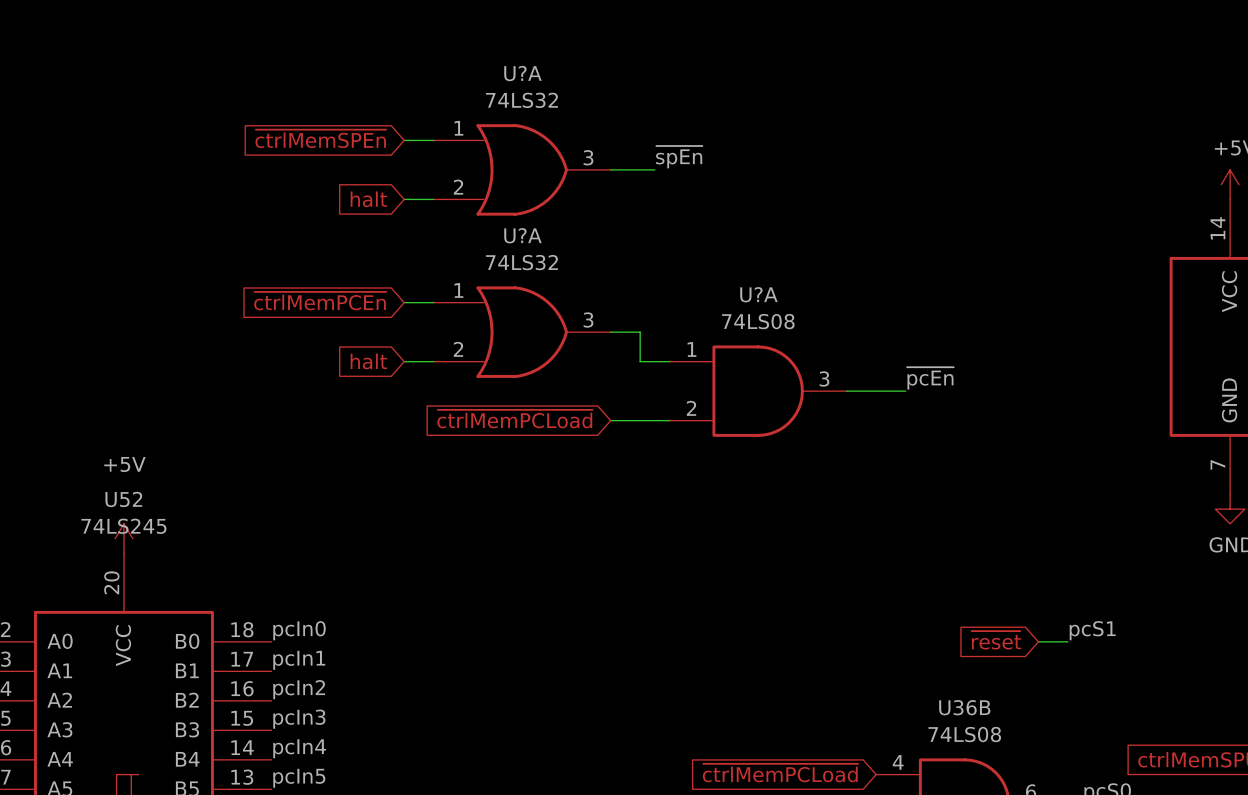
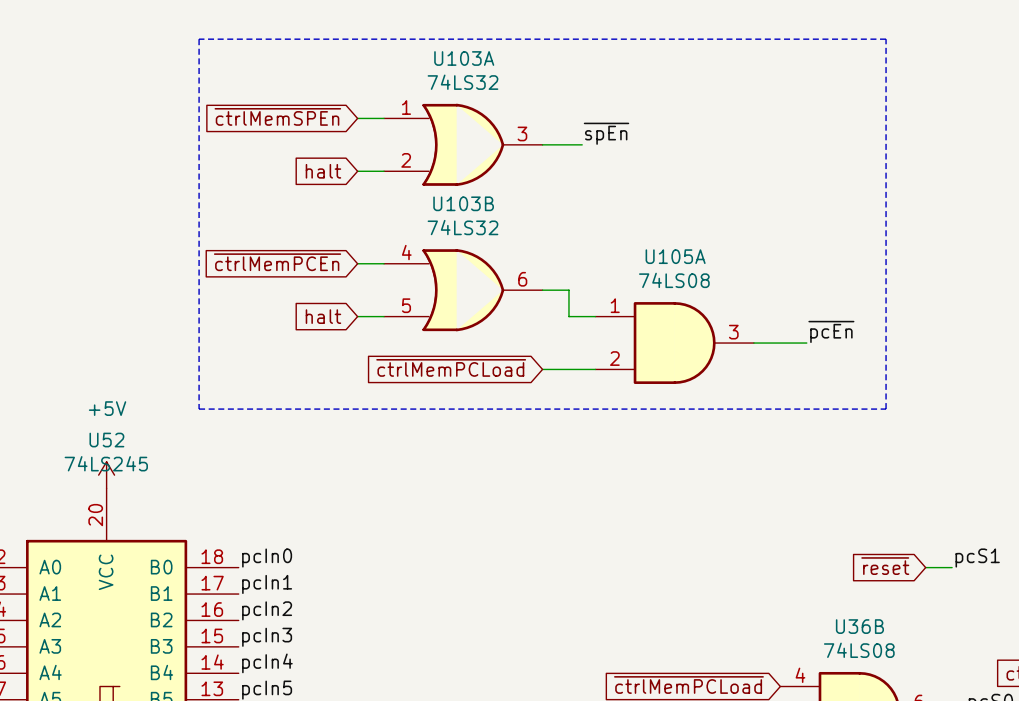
line: none -> (199, 39) (886, 39) (886, 409) (199, 409) (199, 39)
U?A name: U?A (522, 73) -> U103A (464, 58)
U?A name: U?A (522, 235) -> U103B (463, 203)
U?A pin number: 1 (458, 290) -> 4 (406, 252)
U?A name: U?A (758, 294) -> U105A (675, 256)
U?A pin number: 3 (588, 320) -> 6 (522, 279)
U?A pin number: 2 (458, 349) -> 5 (406, 305)

